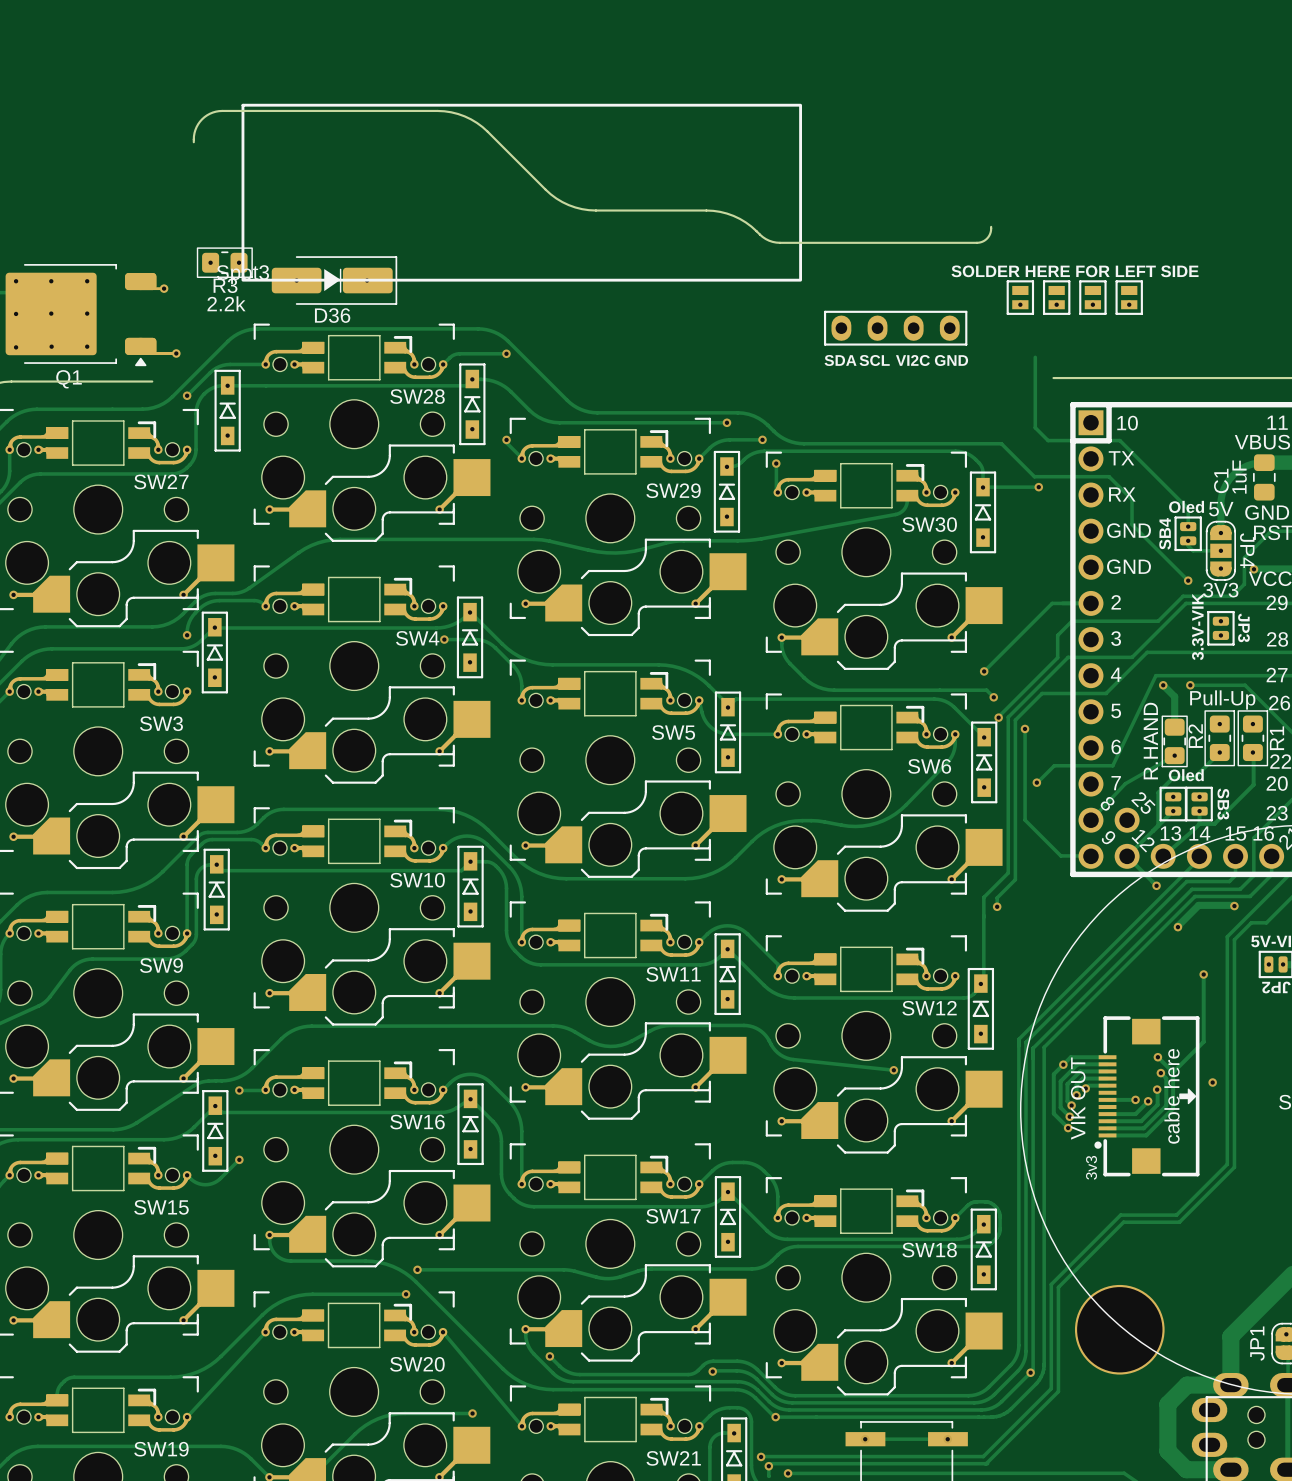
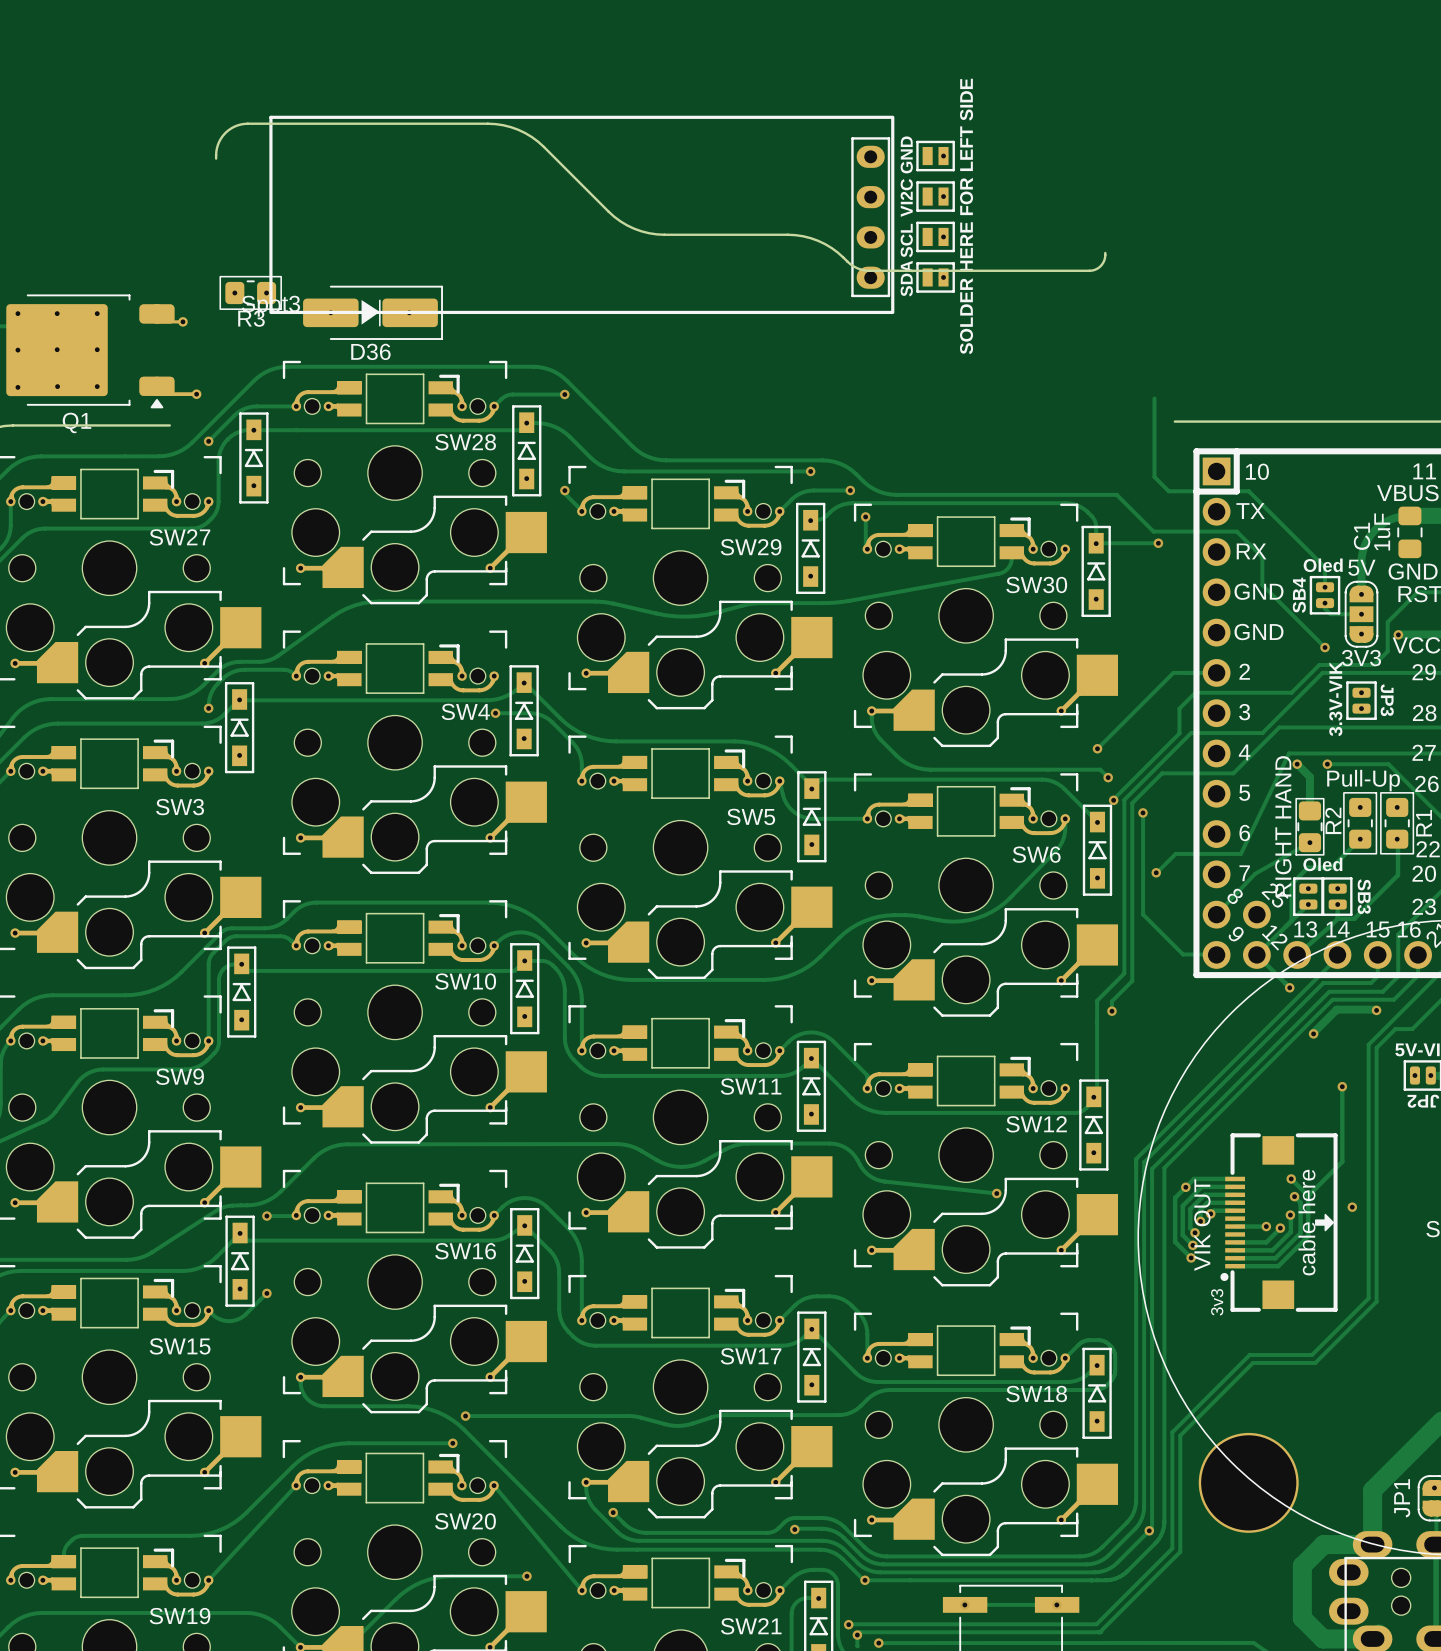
part: none -> (935, 216)
part: (1074, 297) -> none
R3 text: 2.2k (226, 303) -> none
part rotation: 0° (895, 328) -> 90° counterclockwise (870, 217)
part position: (895, 328) -> (870, 217)
part text: JP4 (1247, 550) -> none
part text: R.HAND (1150, 741) -> RIGHT HAND (1283, 826)

